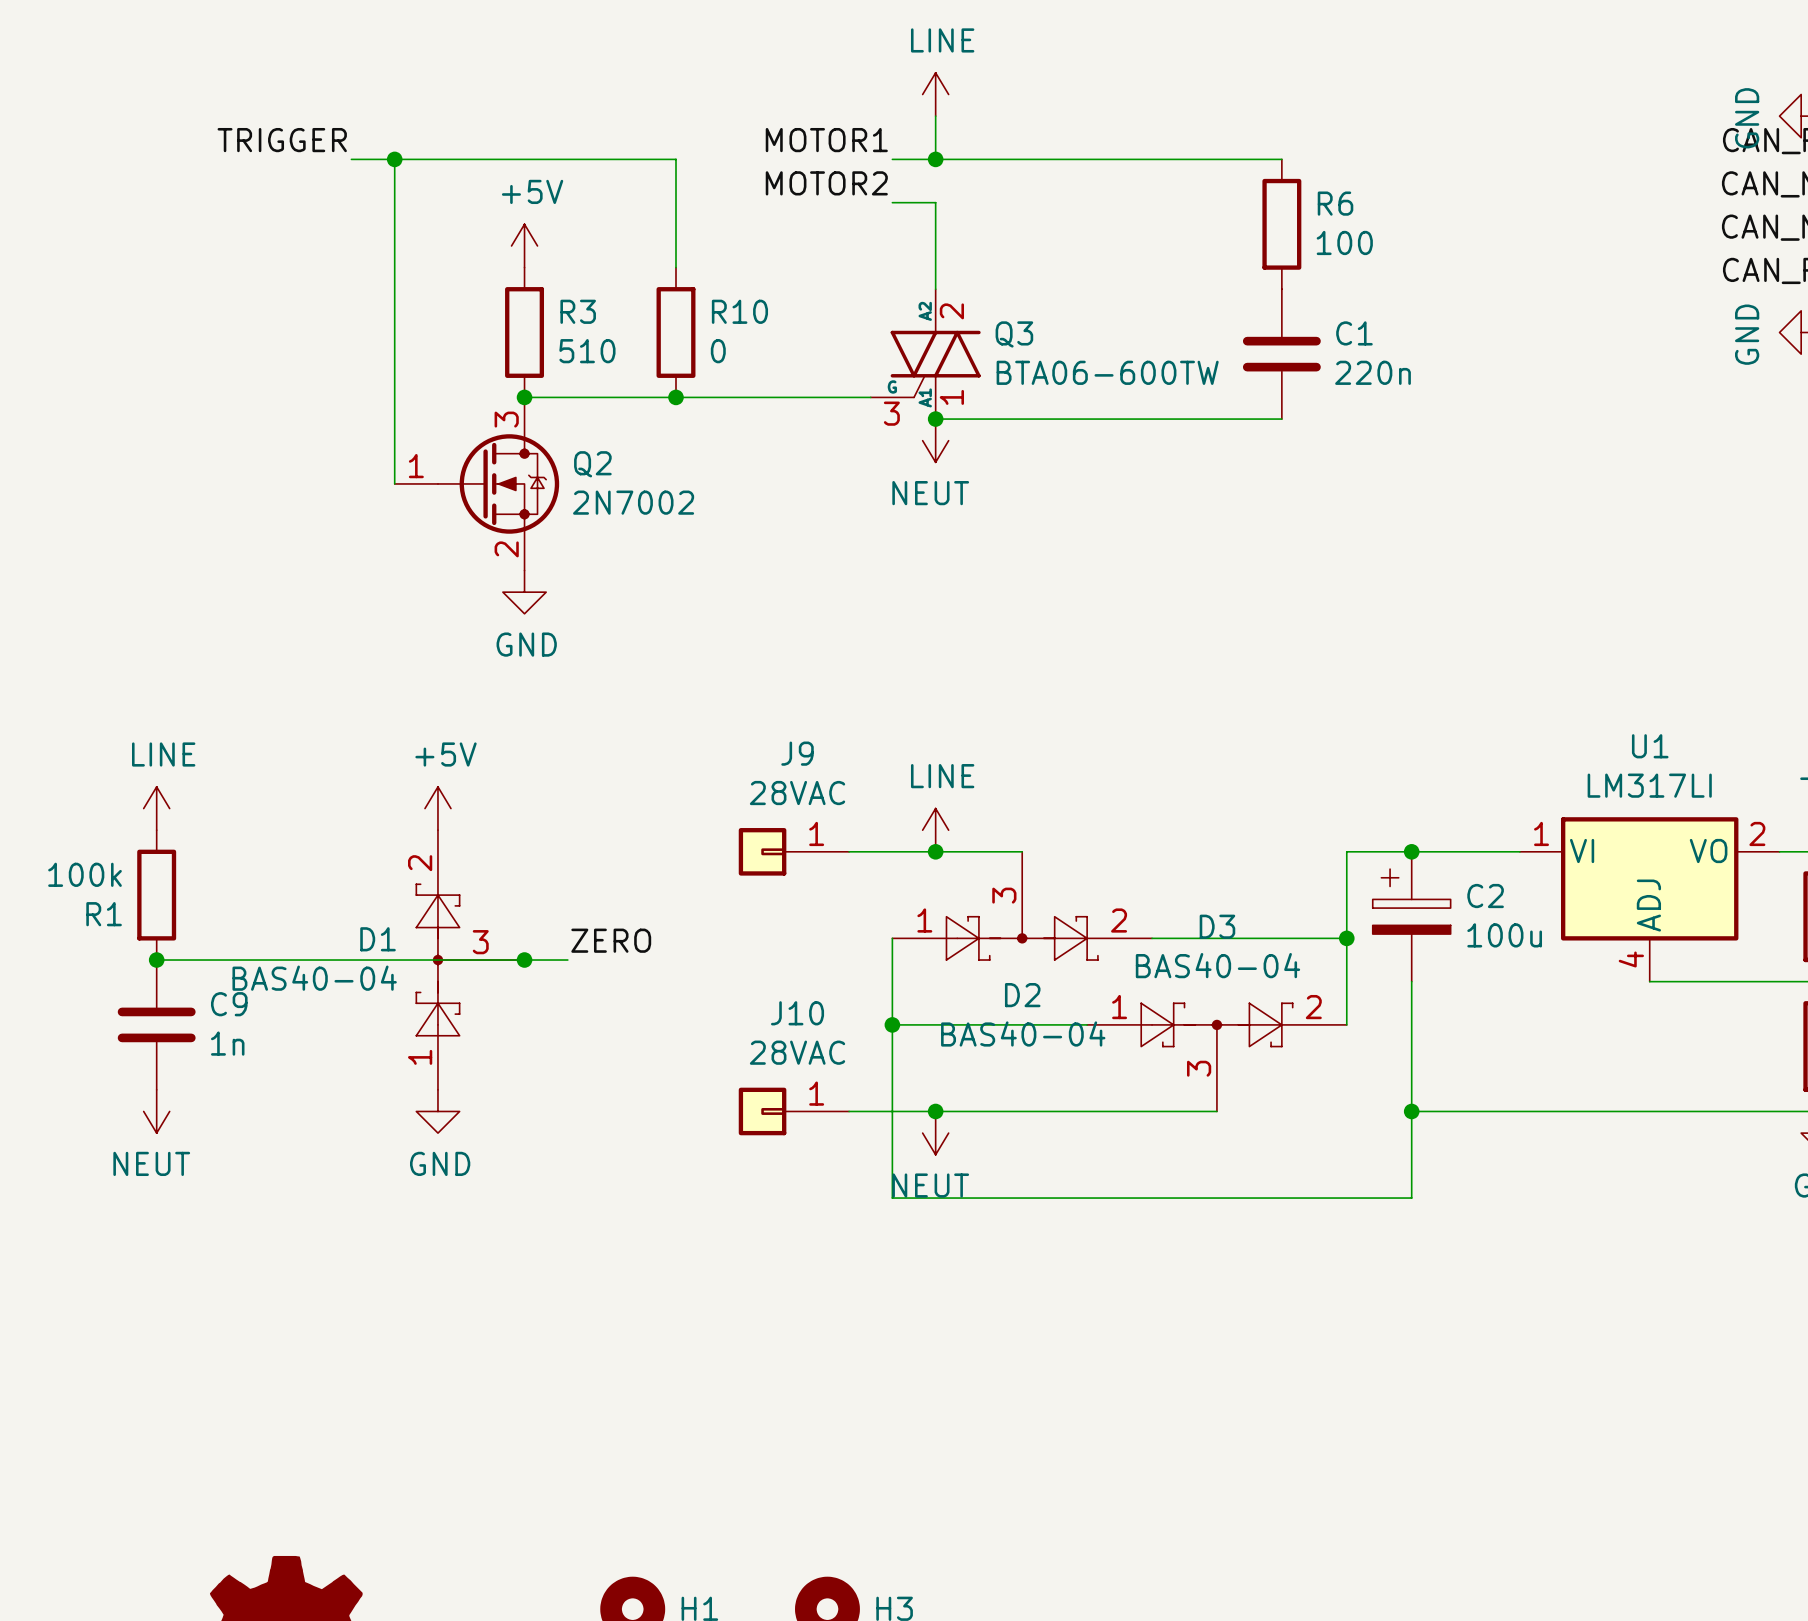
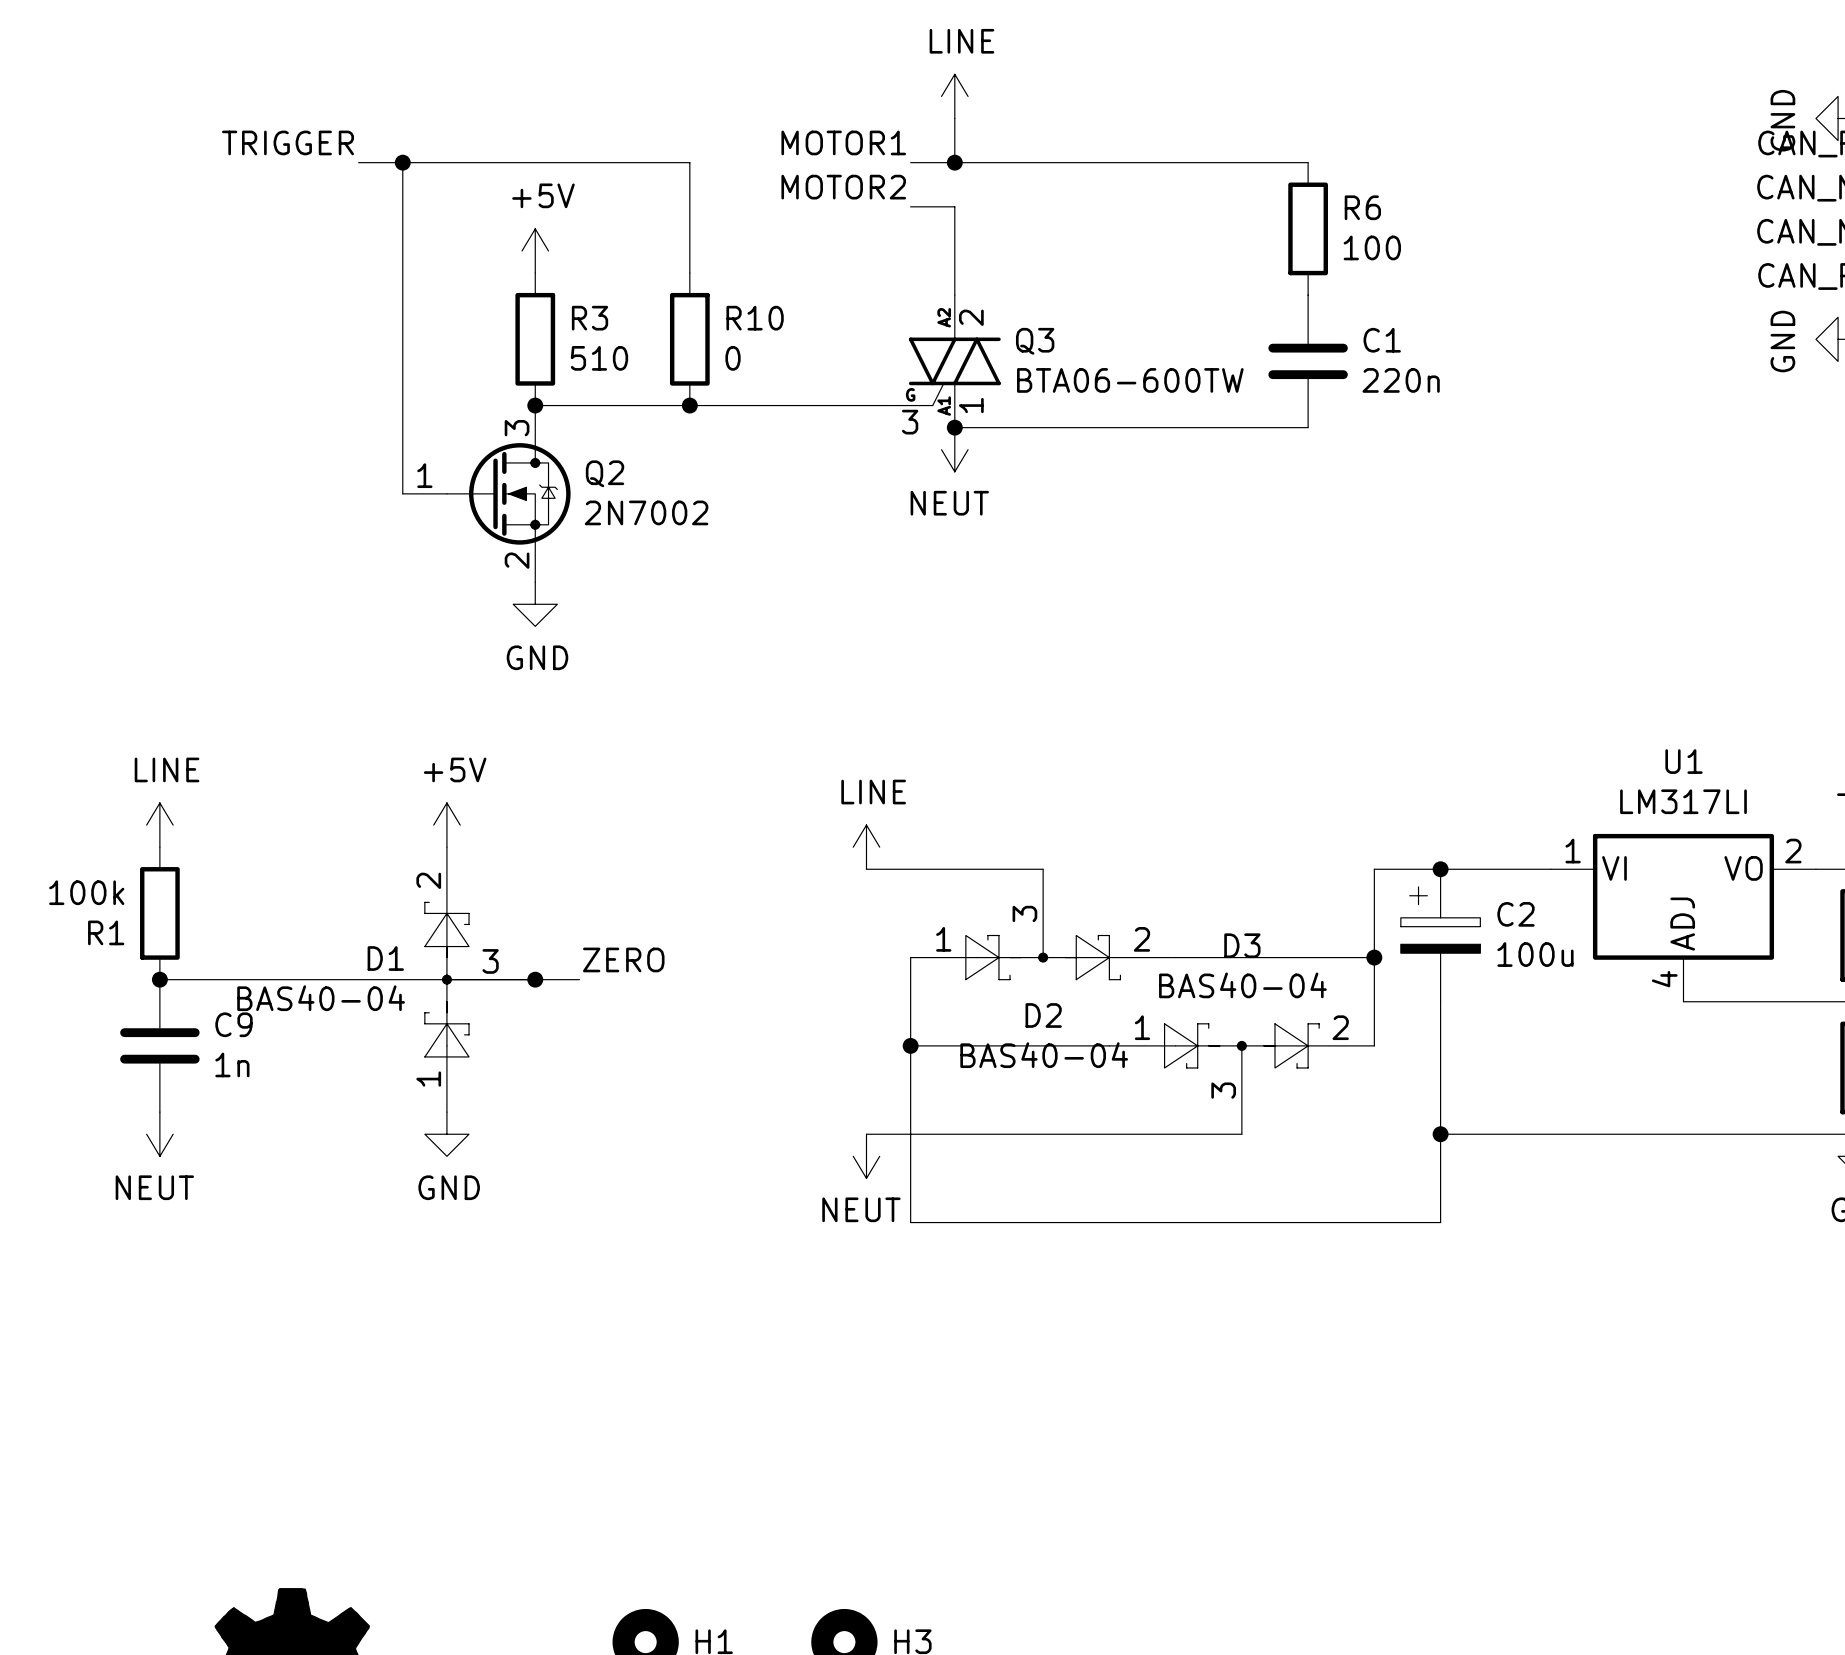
power symbol position: LINE (935, 830) -> LINE (866, 847)
J9: 28VAC (793, 851) -> none
junction: (935, 851) -> none
J10: 28VAC (793, 1111) -> none
junction: (935, 1111) -> none
power symbol position: NEUT (935, 1133) -> NEUT (866, 1156)

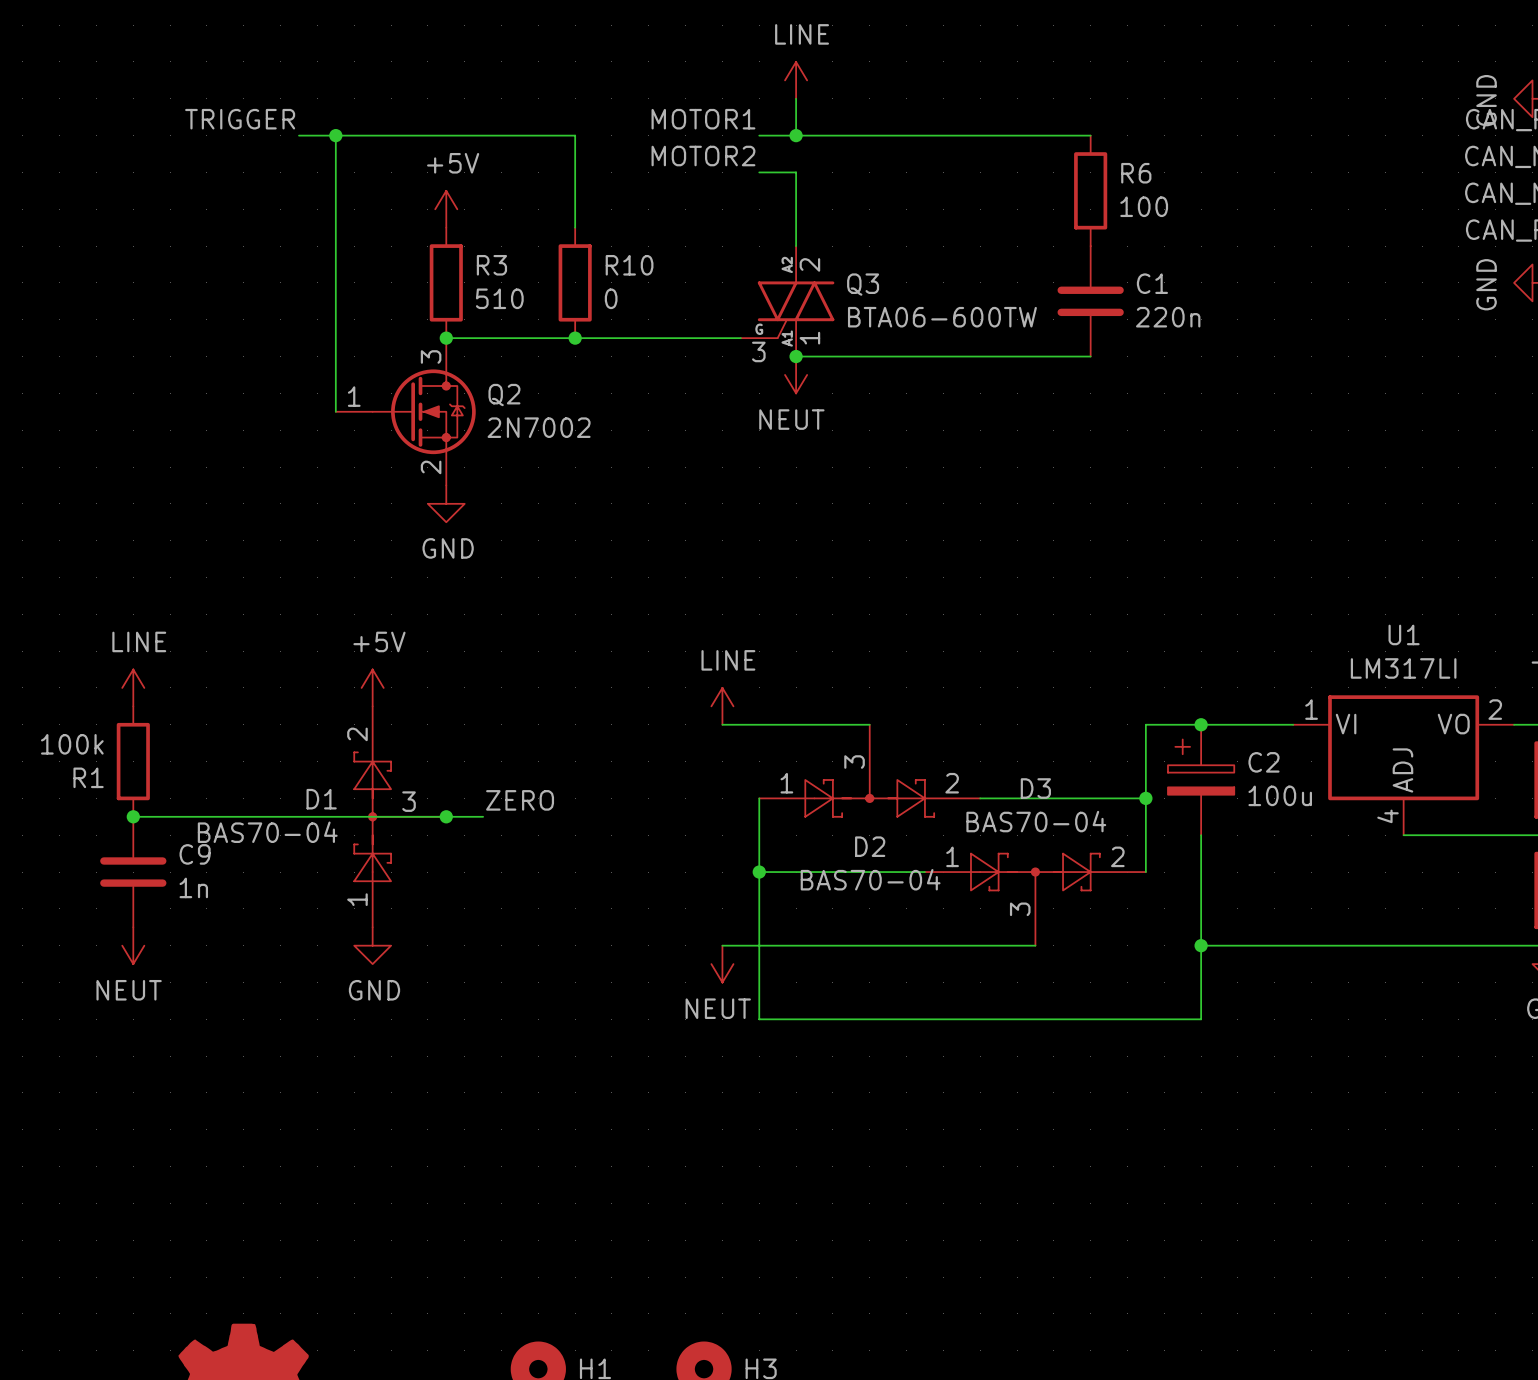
D3 value: BAS40-04 (1242, 985) -> BAS70-04 (1036, 821)
D1 value: BAS40-04 (321, 998) -> BAS70-04 (267, 832)
D2 value: BAS40-04 (1044, 1055) -> BAS70-04 (870, 879)

